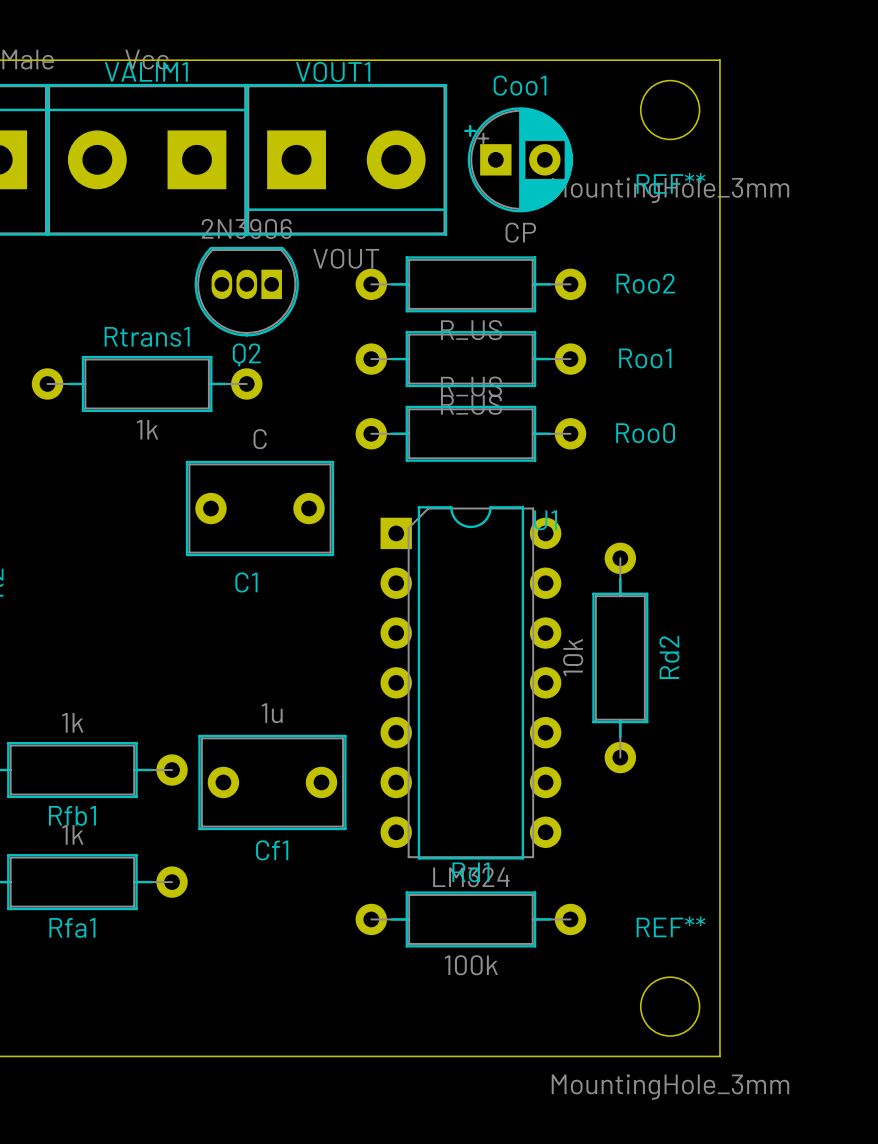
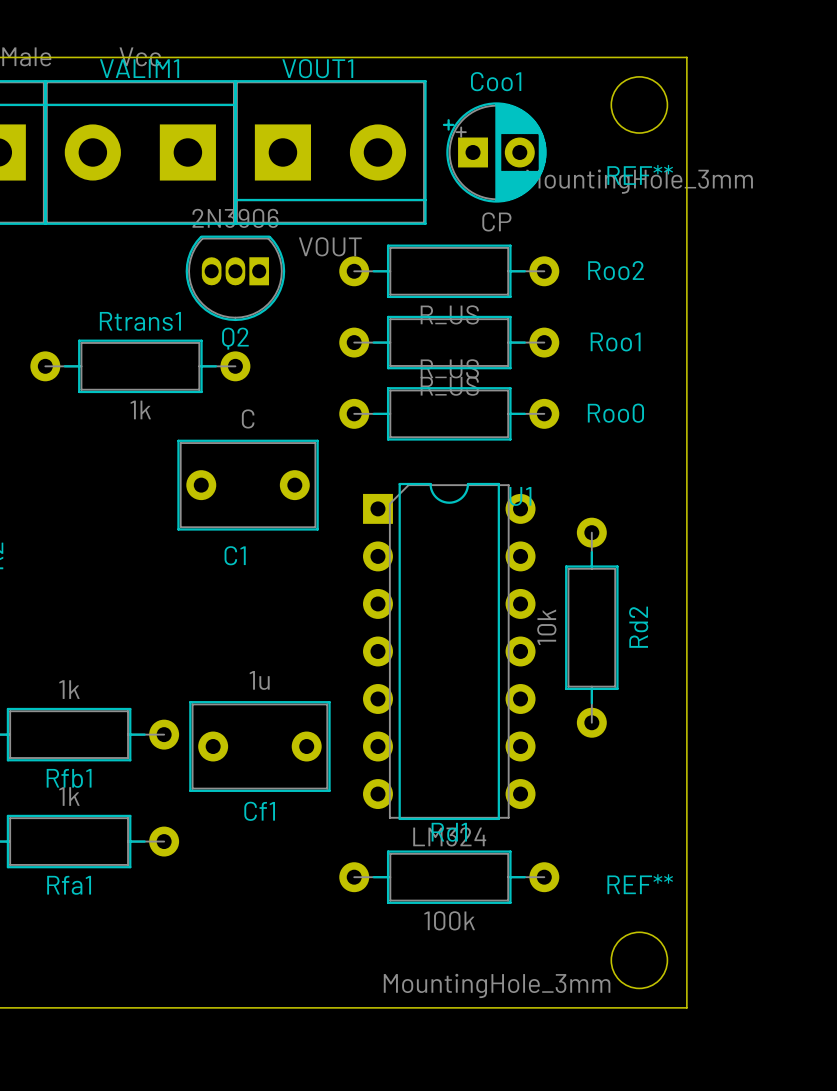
REF** value position: MountingHole_3mm (670, 1086) -> MountingHole_3mm (497, 985)

